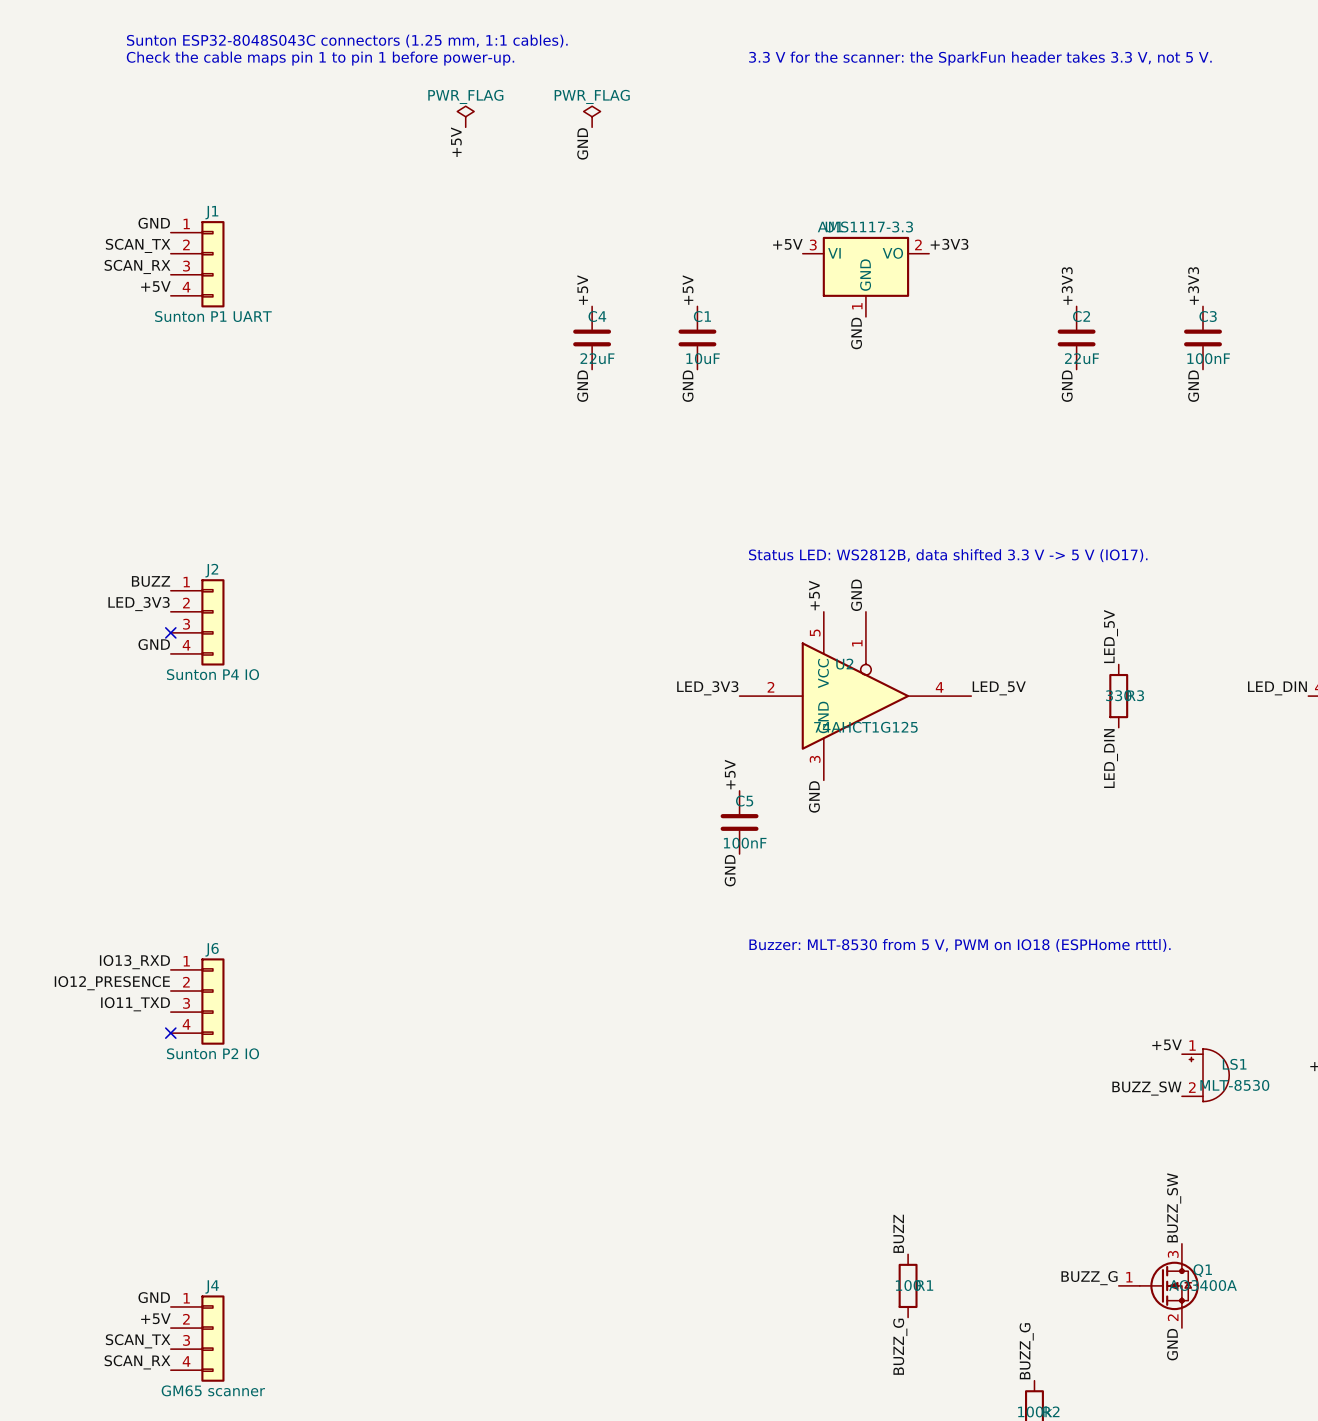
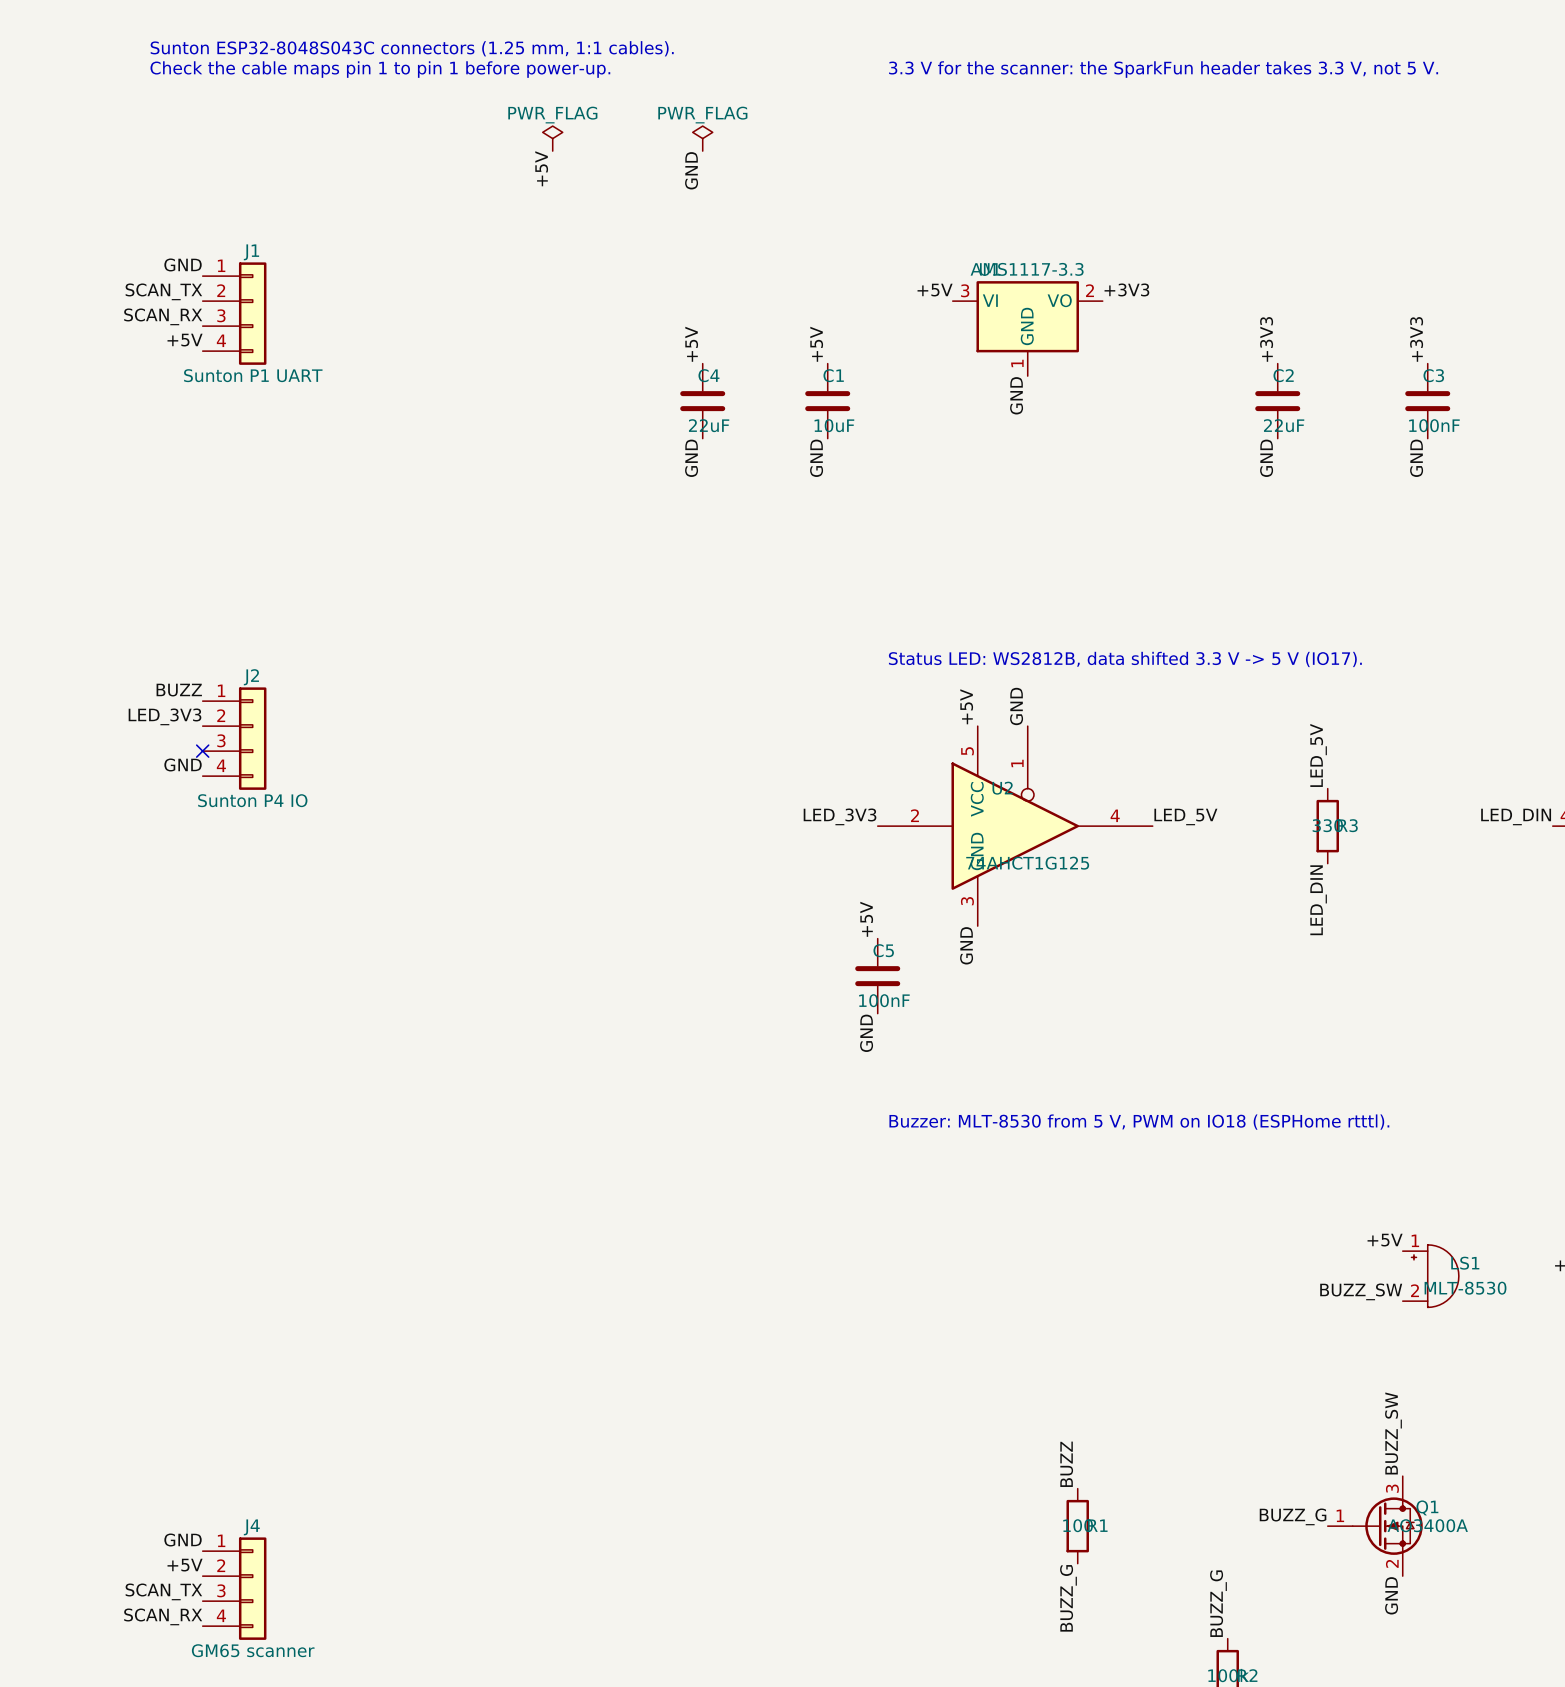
label: IO13_RXD (134, 962) -> none
label: IO12_PRESENCE (112, 983) -> none
J6: Sunton P2 IO (197, 1001) -> none
label: IO11_TXD (135, 1004) -> none
no-connect mark: (170, 1033) -> none

